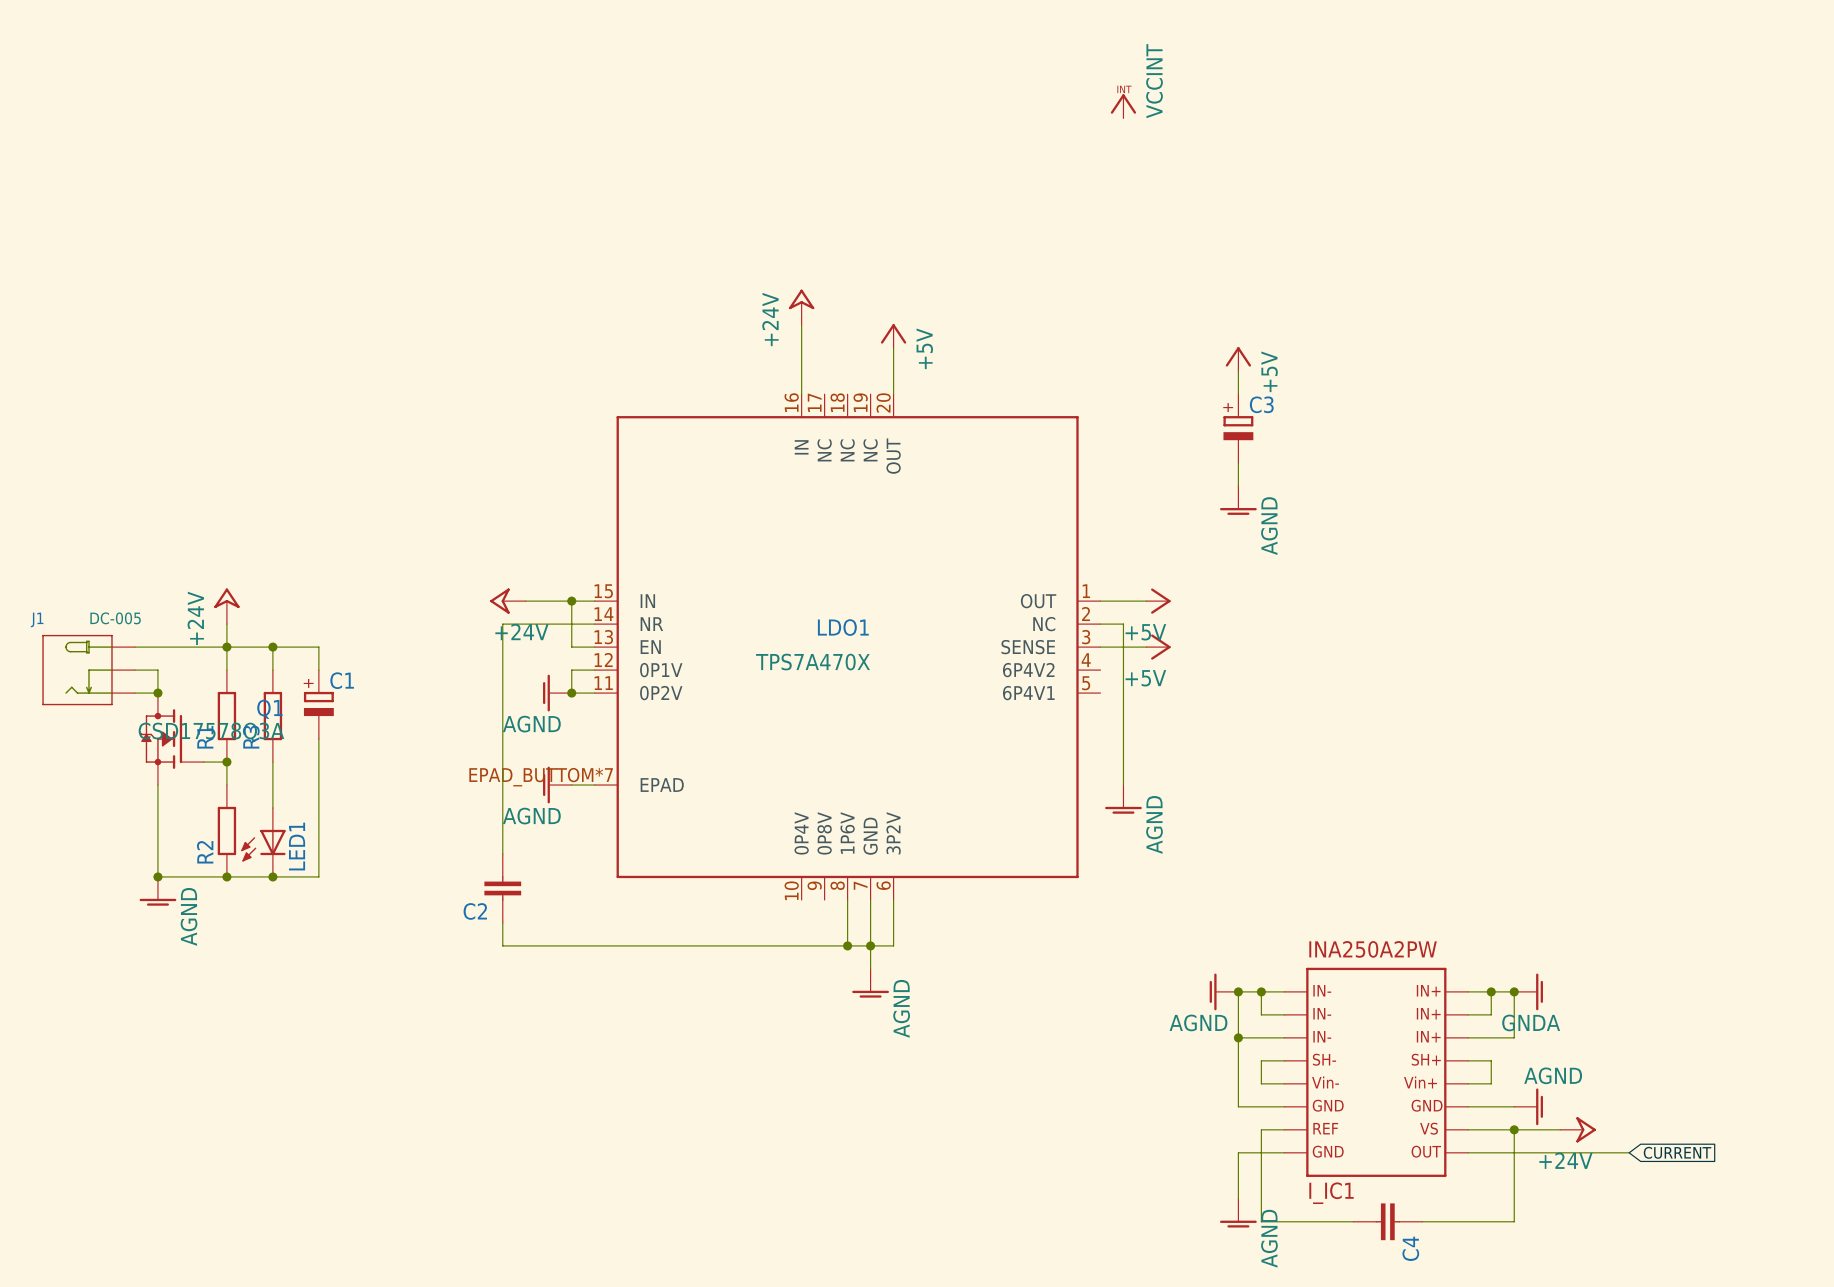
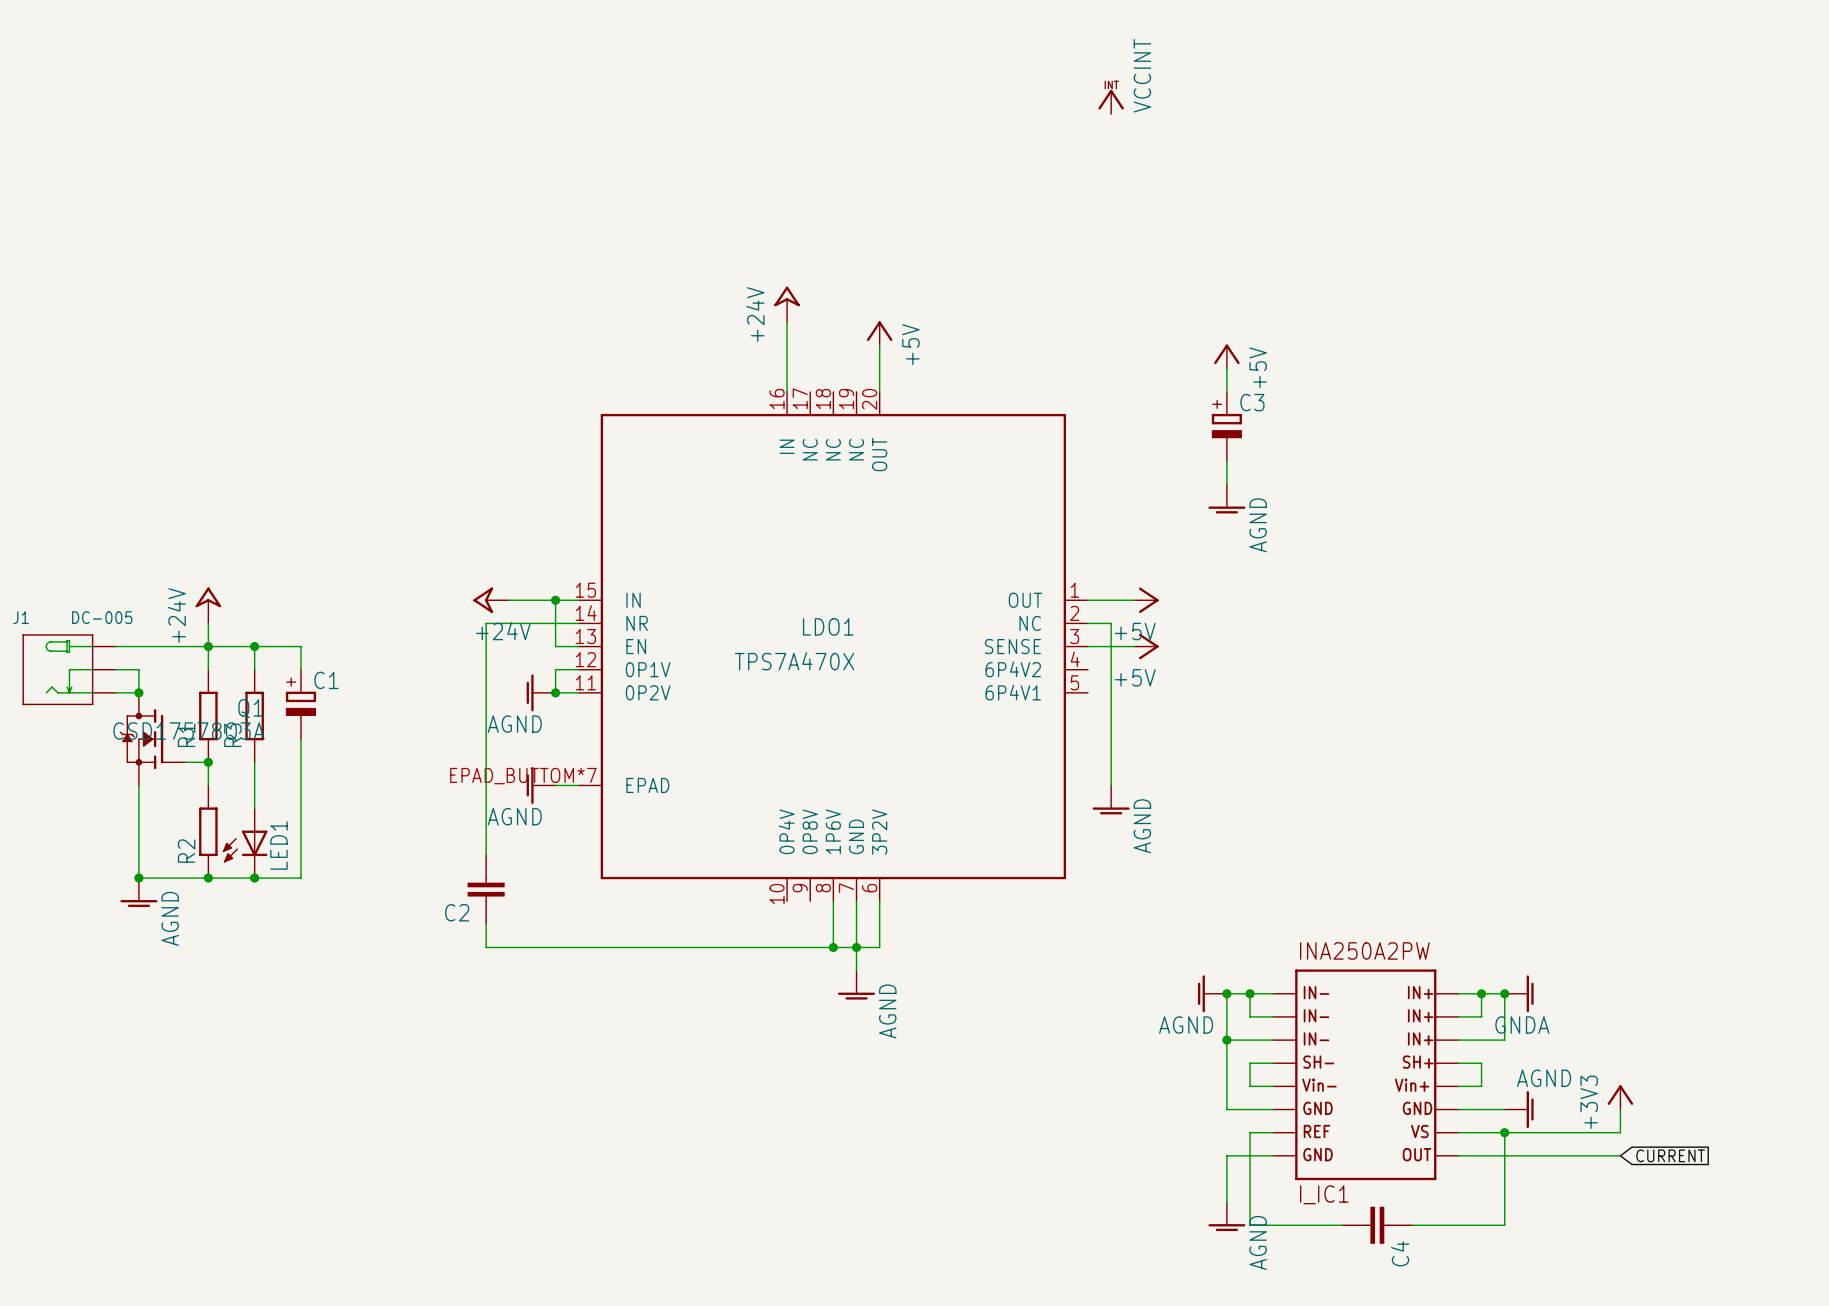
power symbol: none -> +3V3 (1620, 1097)
wire: none -> (1620, 1109) (1620, 1132) (1550, 1132)
power symbol: +24V (1578, 1129) -> none

